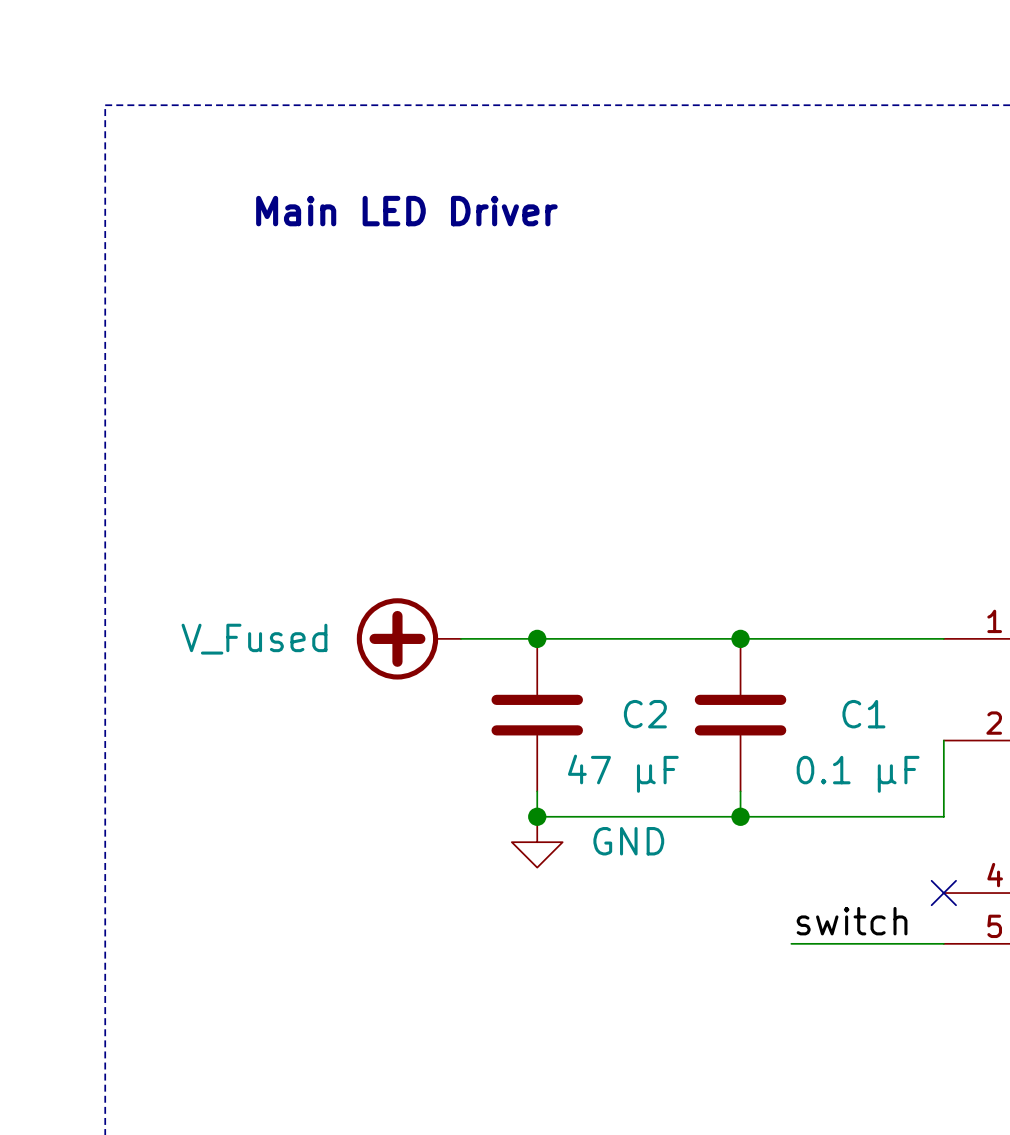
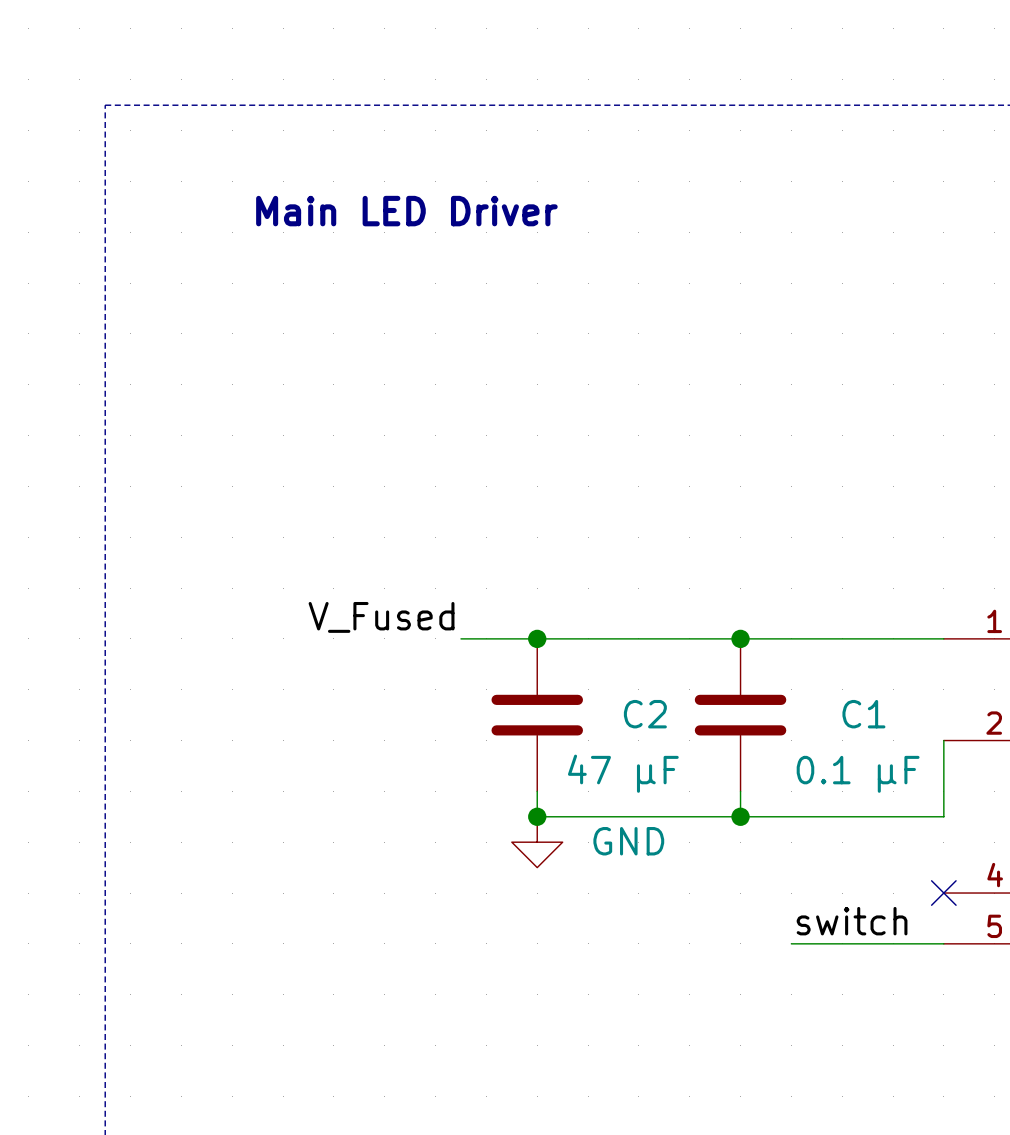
label: none -> V_Fused (381, 617)
power symbol: V_Fused (408, 638) -> none

